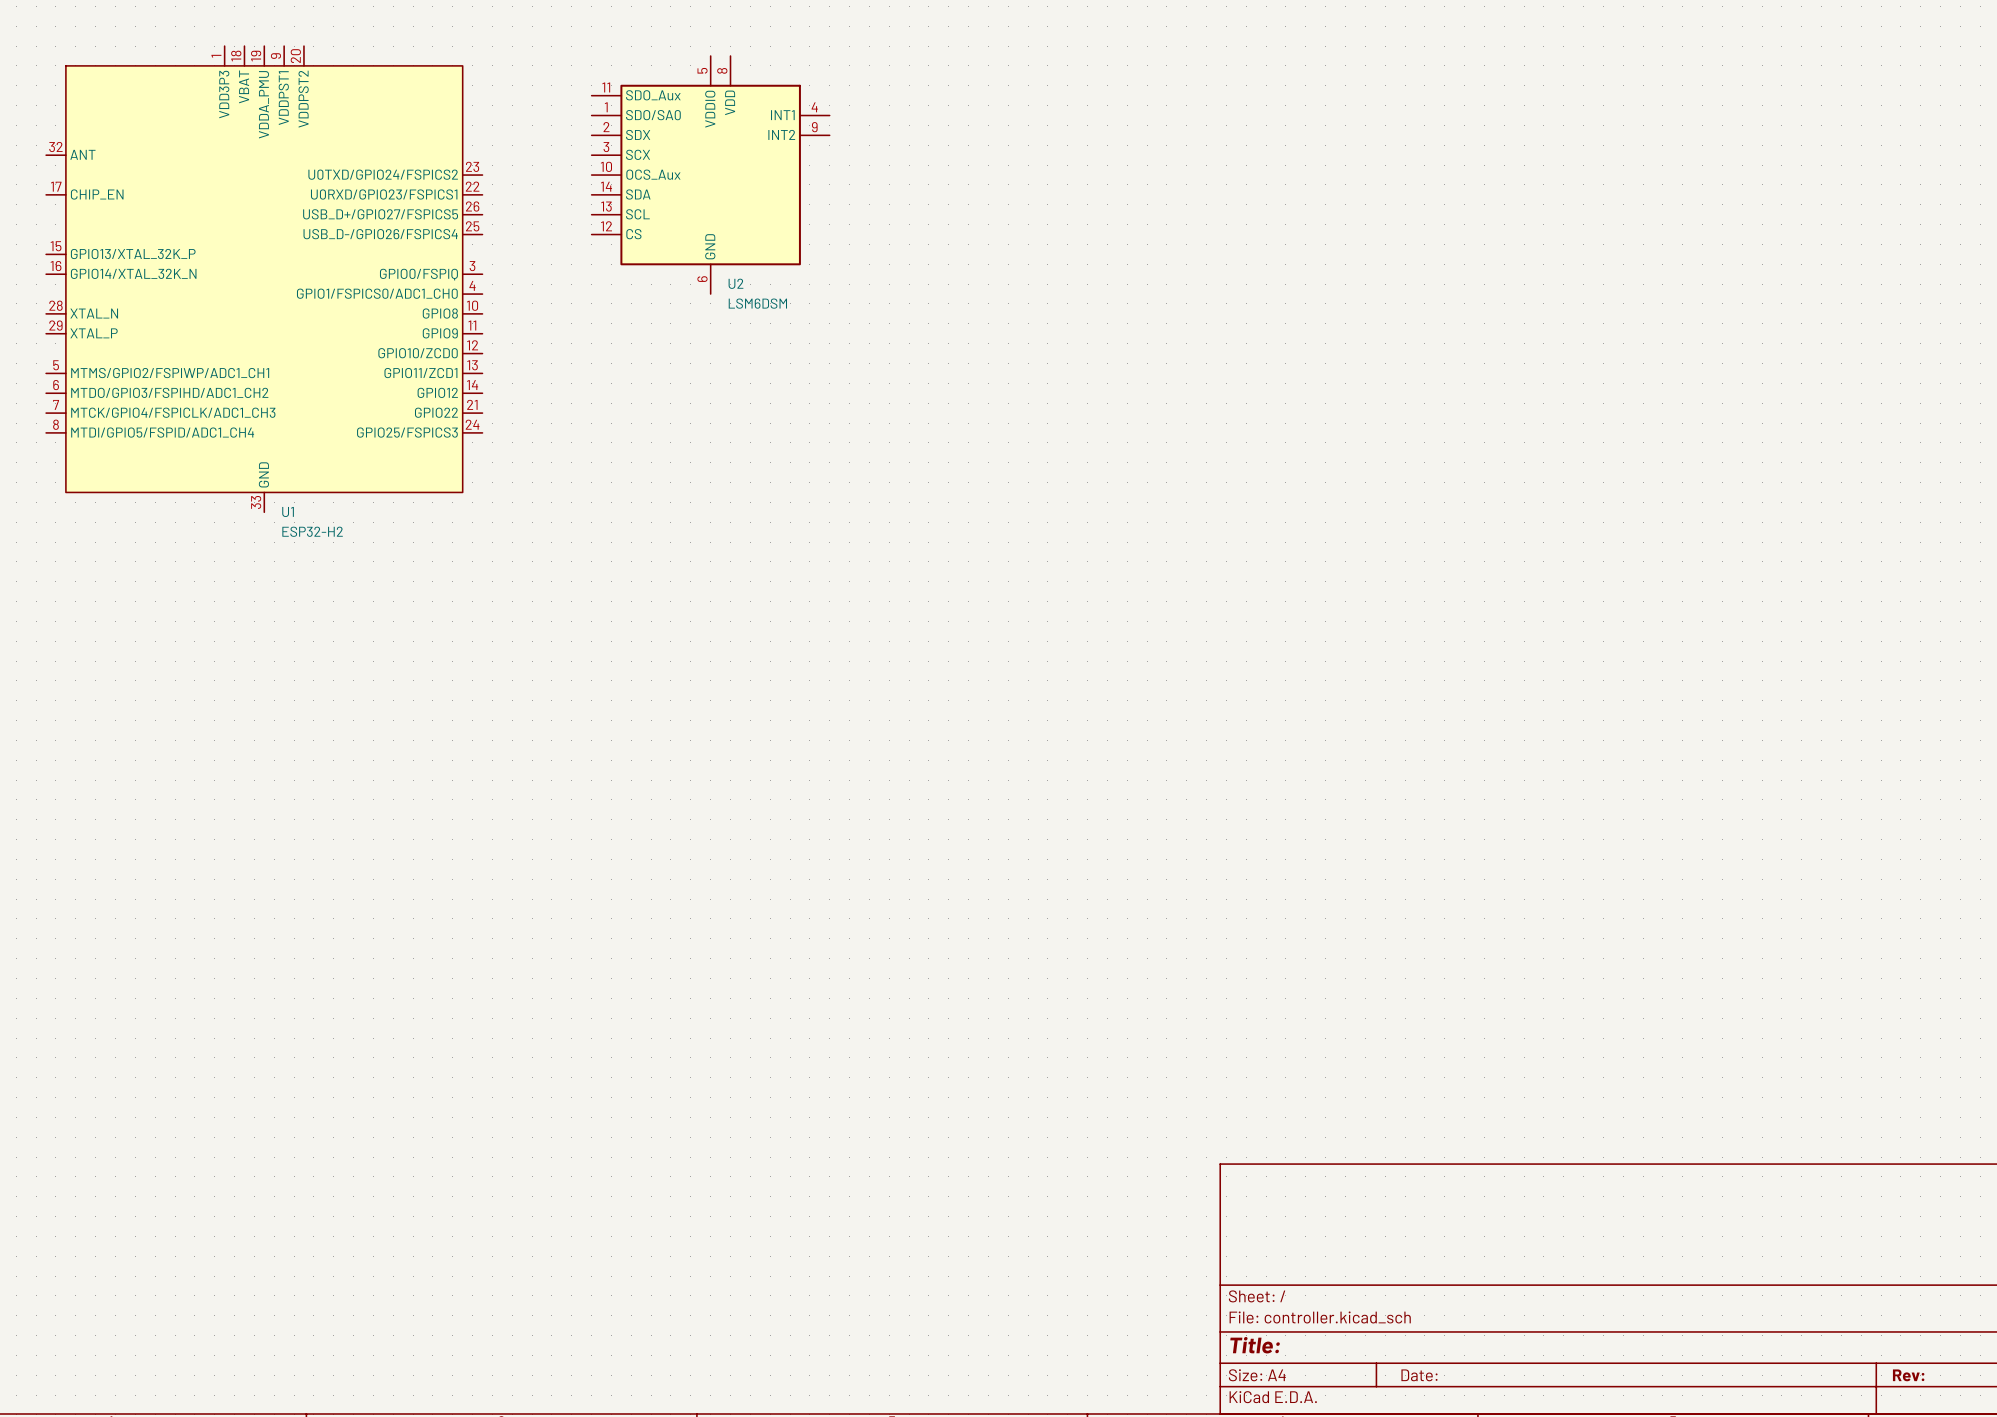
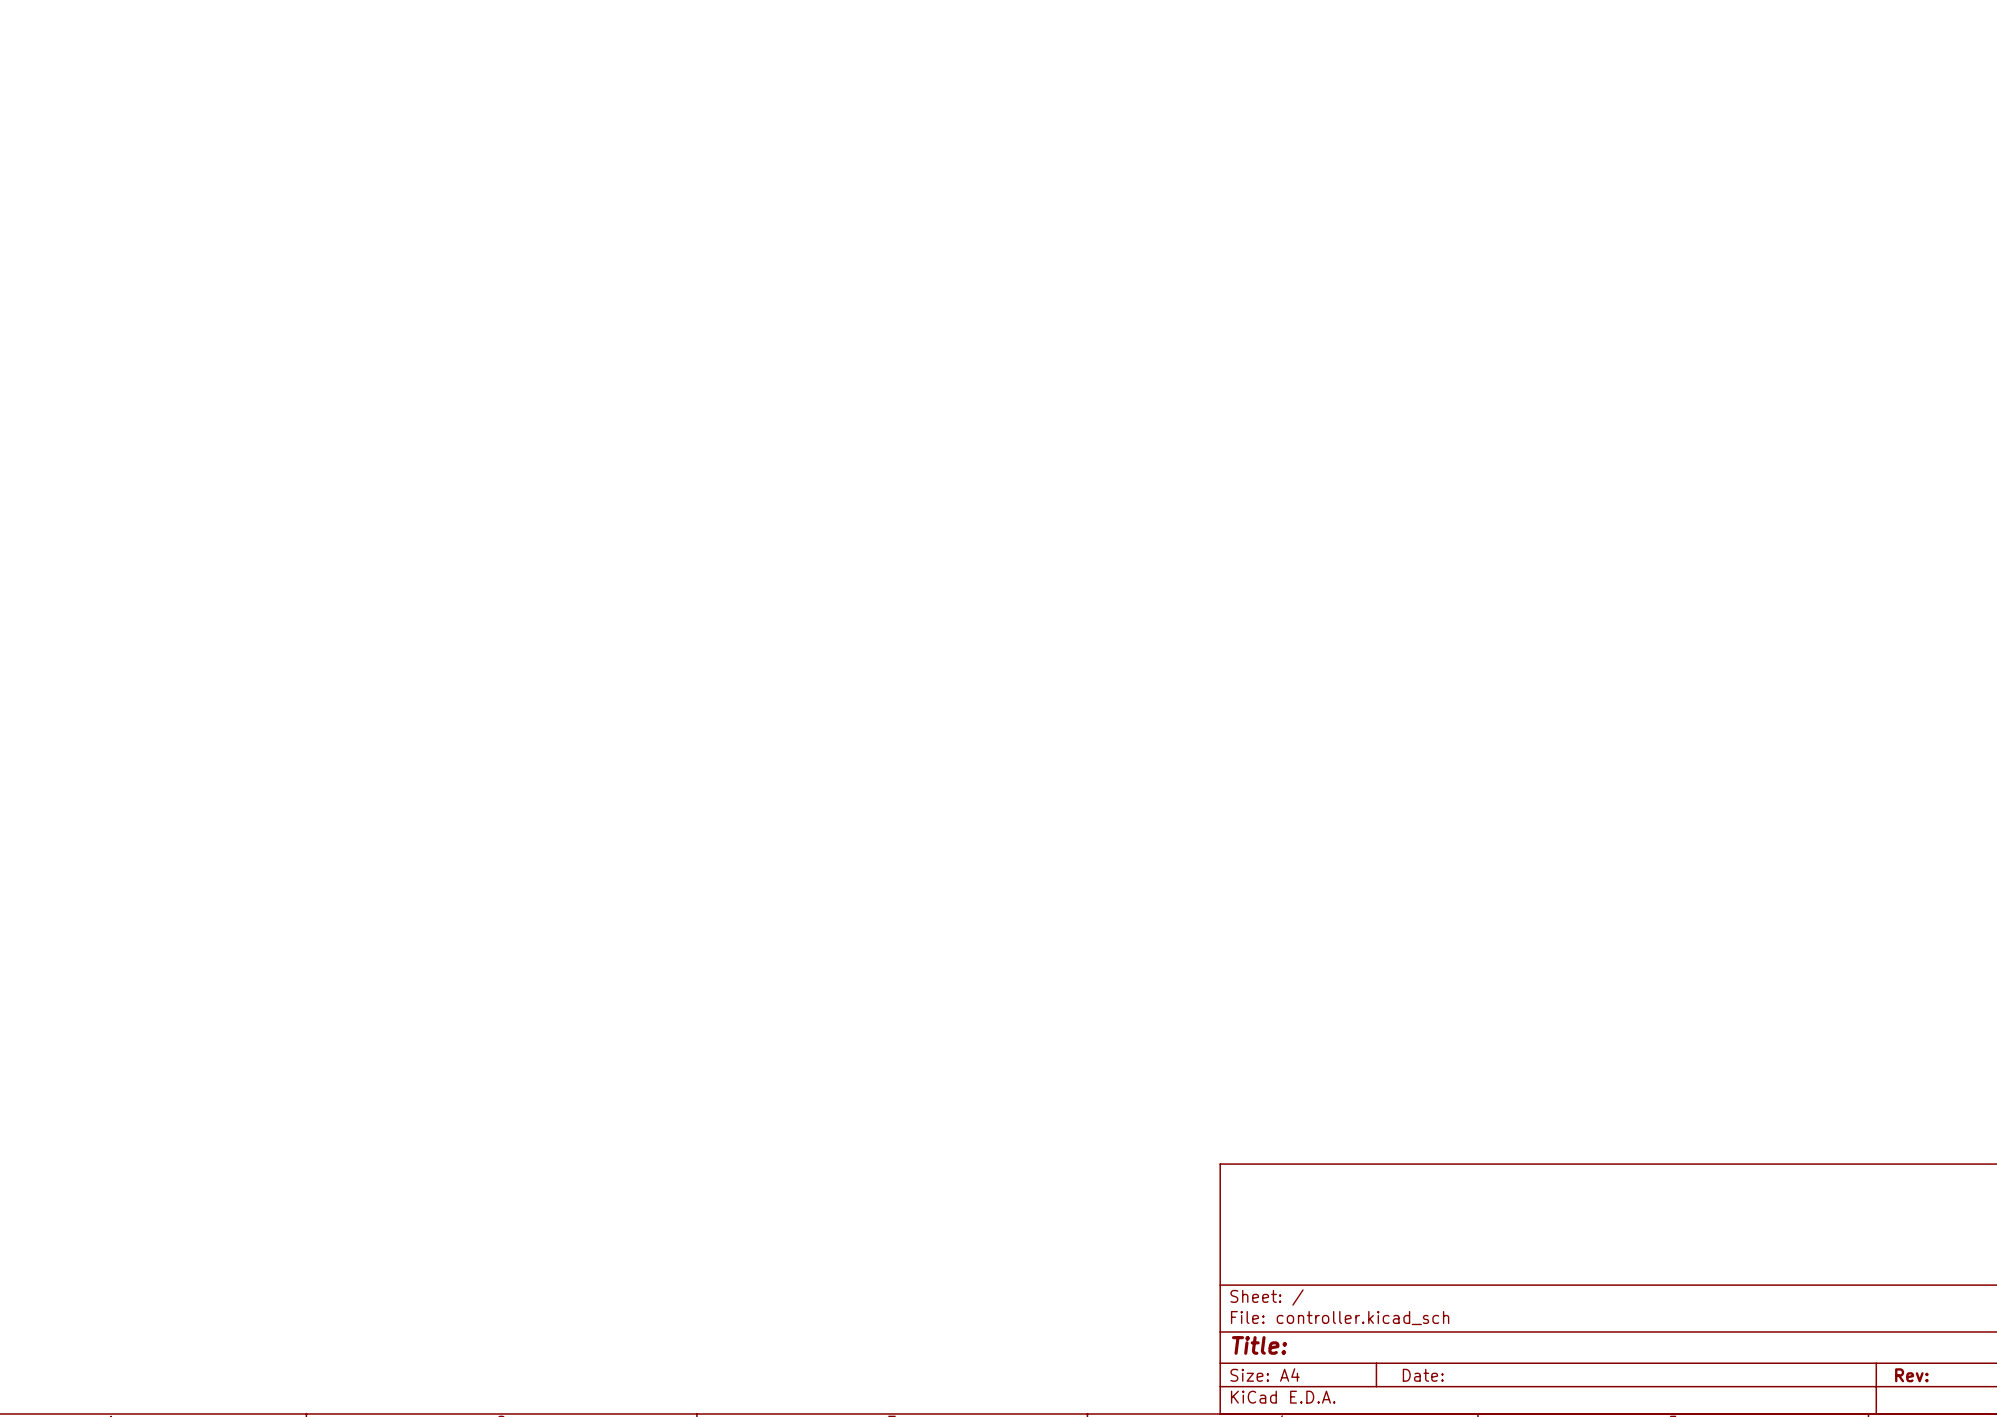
U2: LSM6DSM (710, 175) -> none
U1: ESP32-H2 (264, 279) -> none

